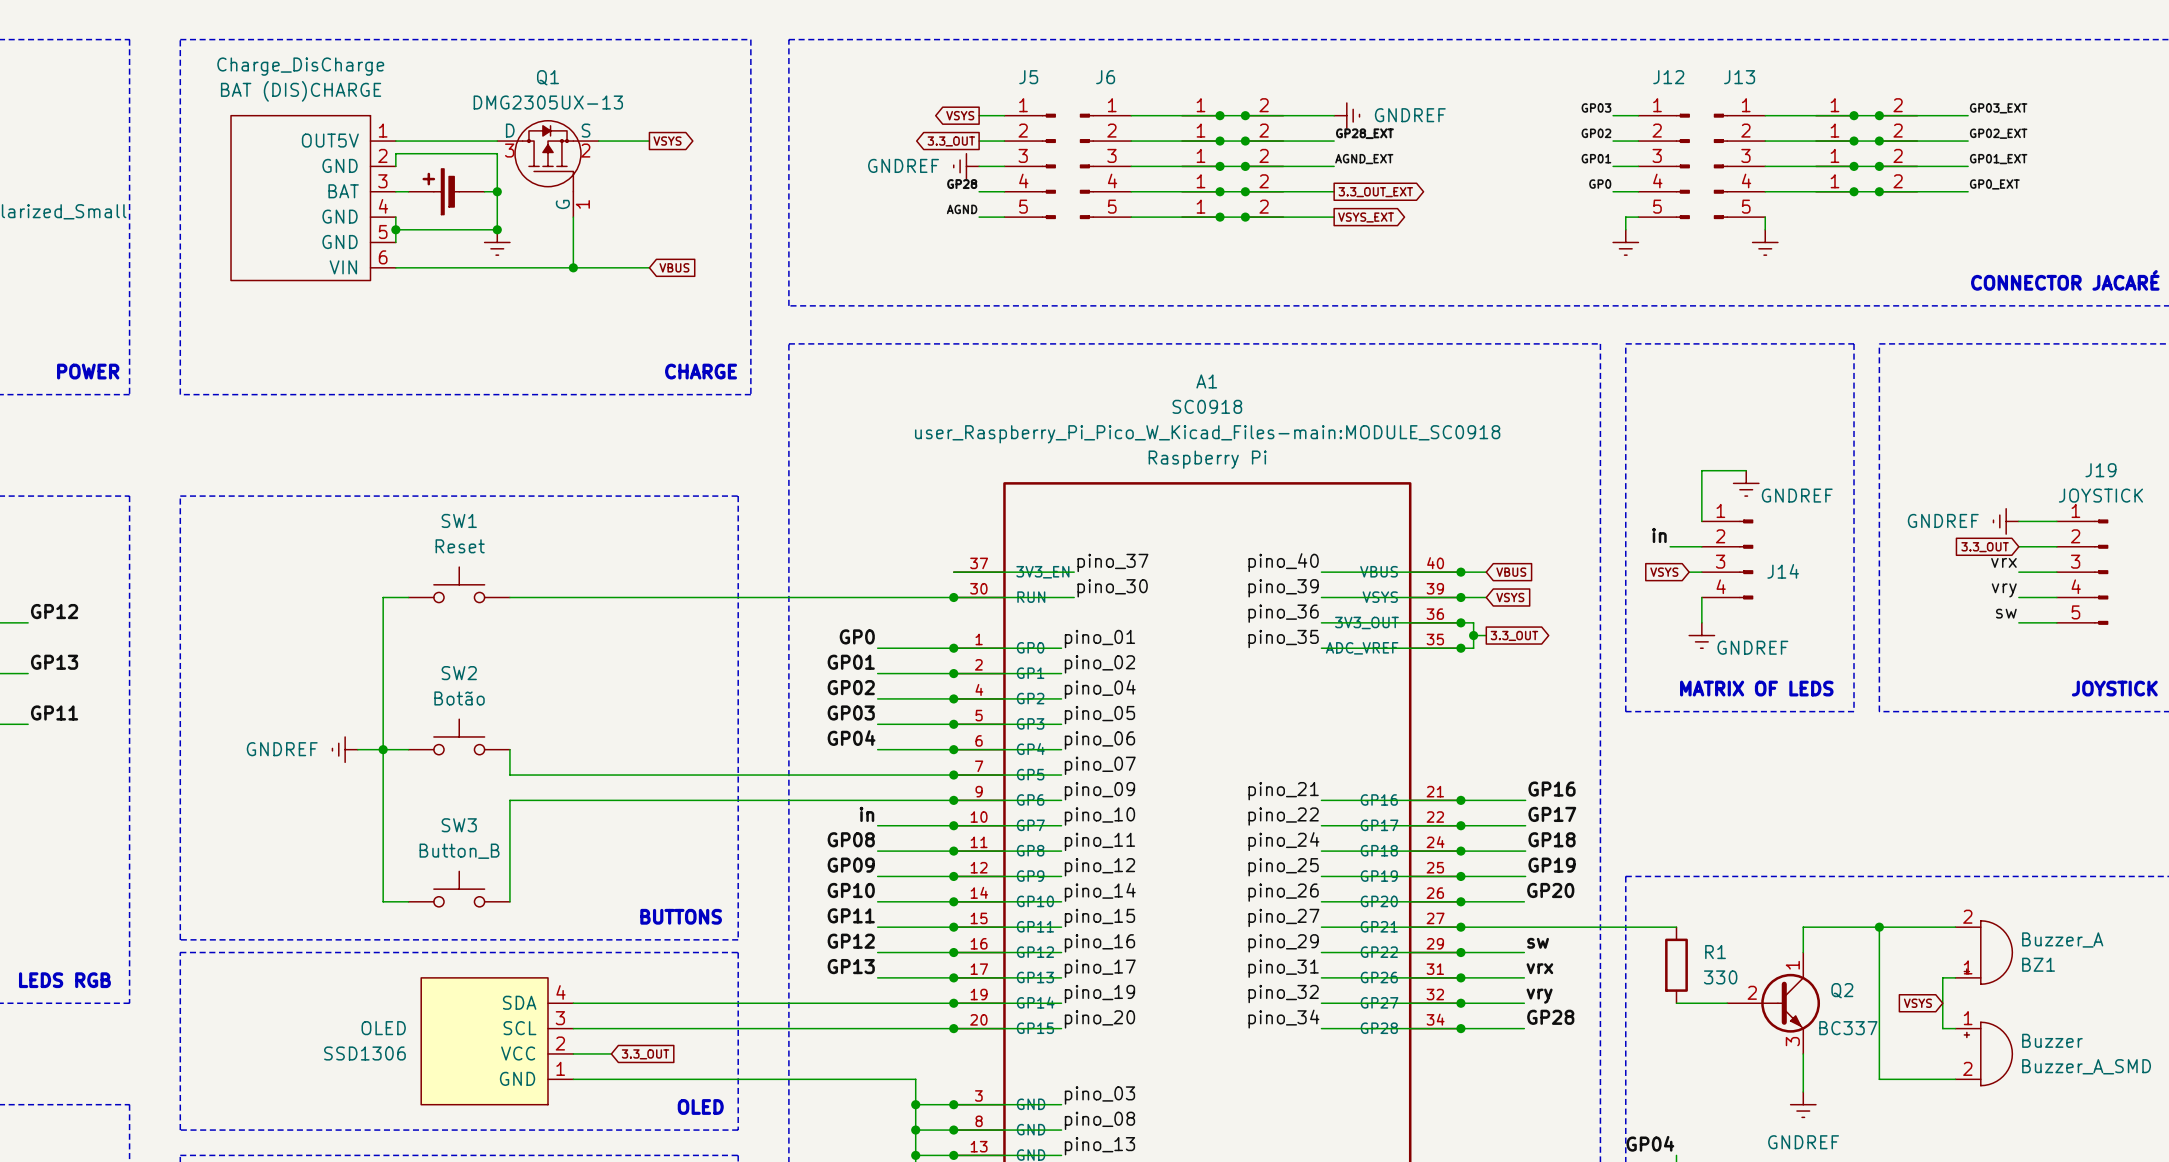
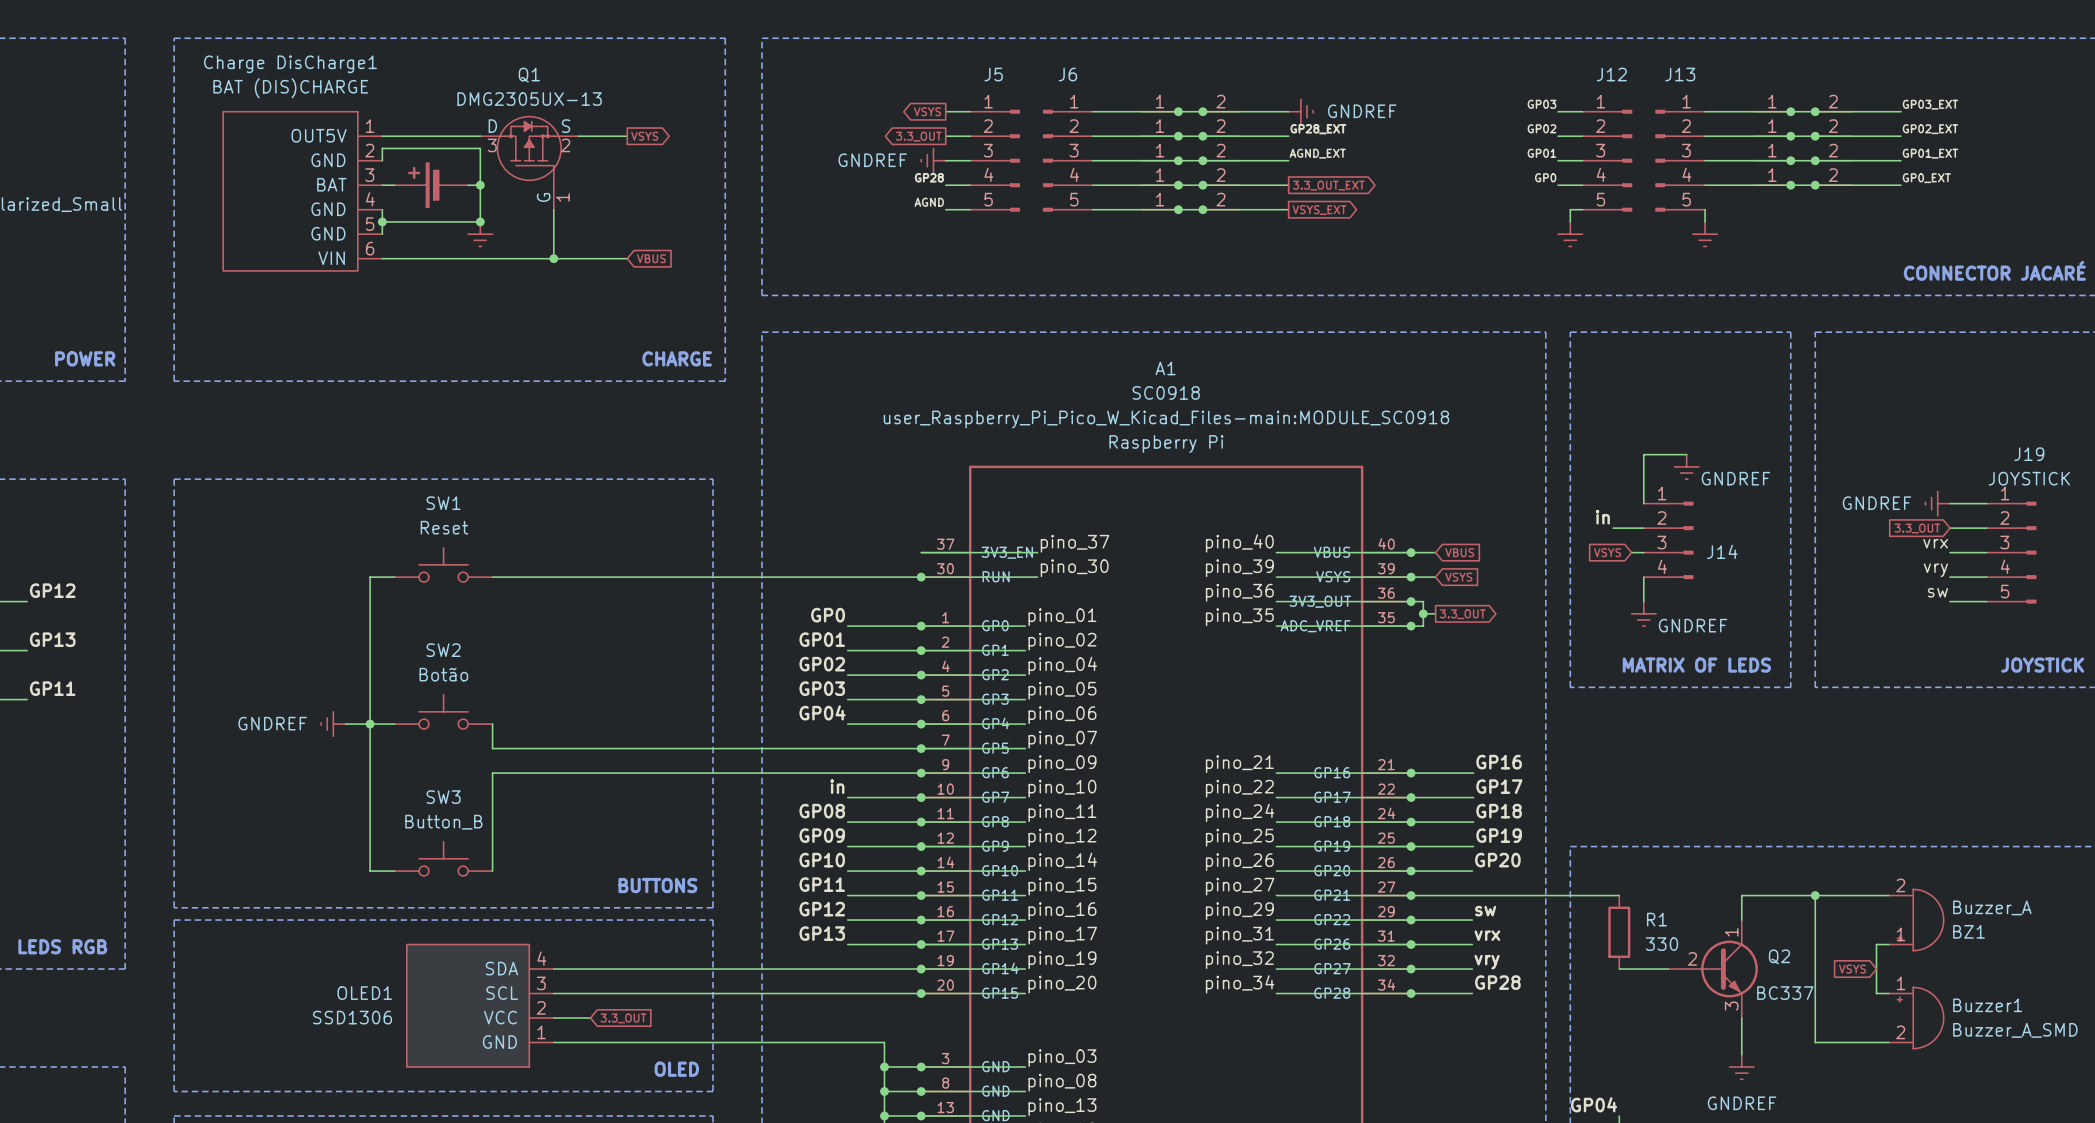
Charge_DisCharge name: Charge_DisCharge (300, 66) -> Charge DisCharge1 (290, 64)
OLED name: OLED (383, 1028) -> OLED1 (364, 993)
Buzzer name: Buzzer (2052, 1040) -> Buzzer1 (1987, 1005)

